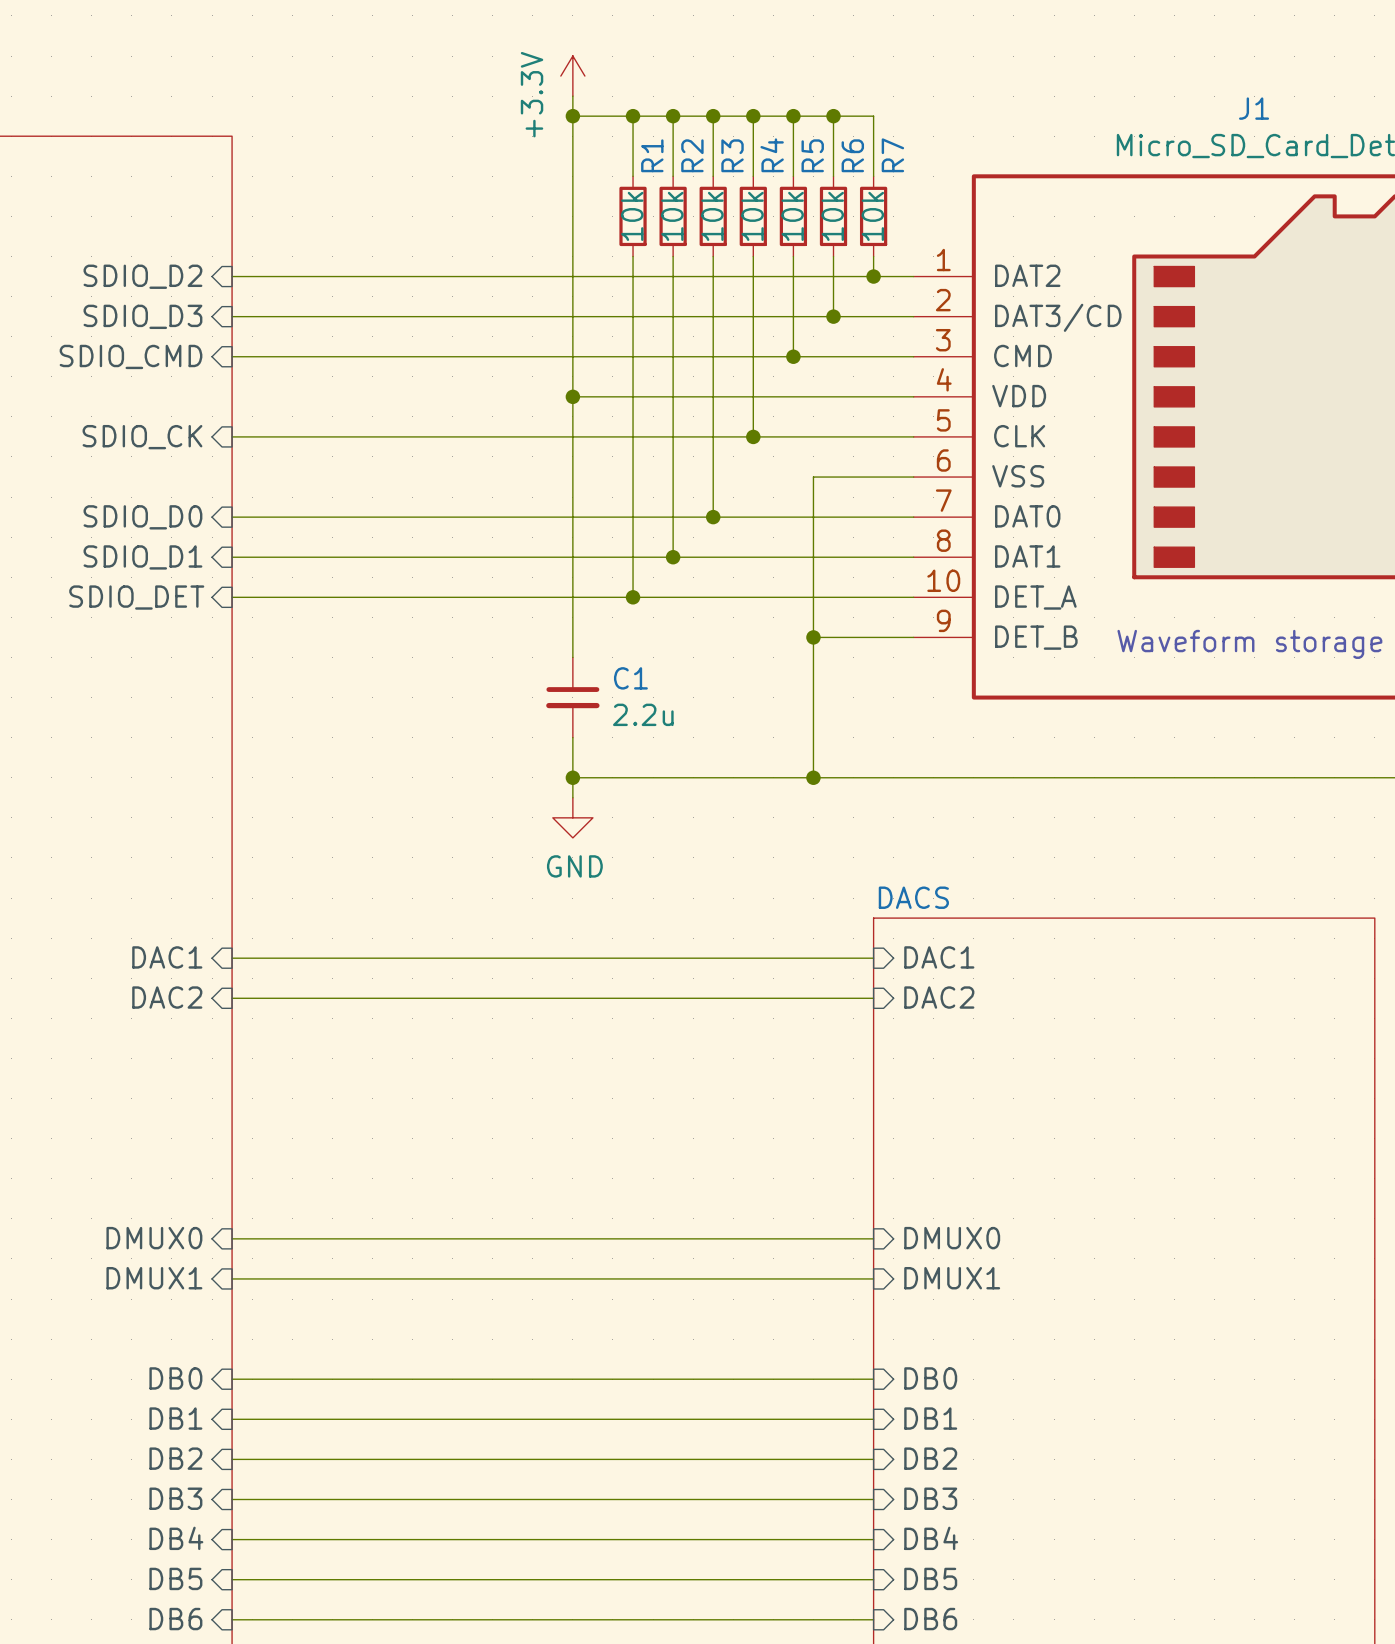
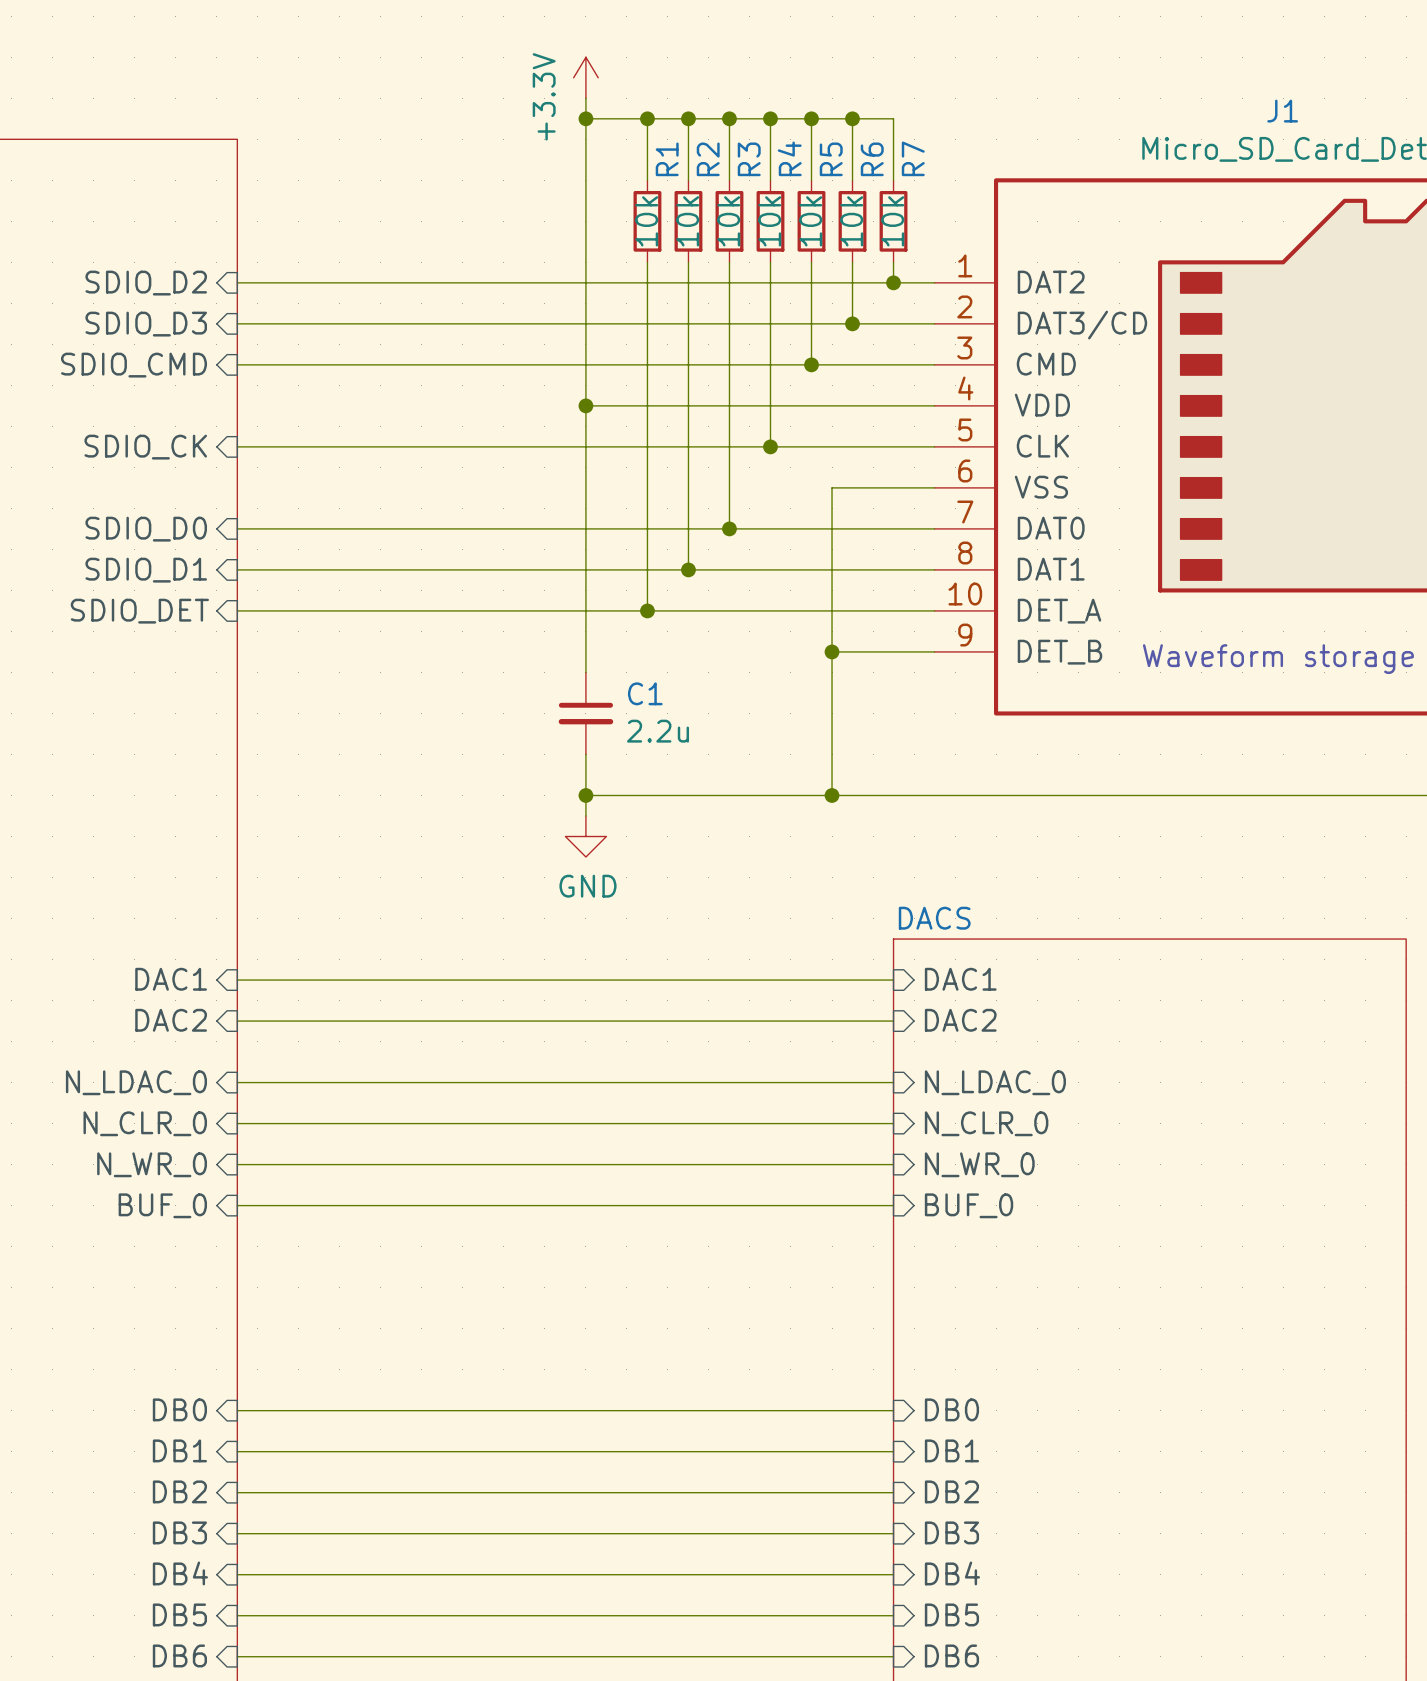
sheet pin: none -> N_LDAC_0 (136, 1082)
wire: none -> (237, 1082) (893, 1082)
sheet pin: none -> N_LDAC_0 (995, 1082)
sheet pin: none -> N_CLR_0 (145, 1123)
wire: none -> (237, 1123) (893, 1123)
sheet pin: none -> N_CLR_0 (986, 1123)
sheet pin: none -> N_WR_0 (152, 1164)
sheet pin: none -> N_WR_0 (979, 1164)
sheet pin: none -> BUF_0 (162, 1205)
sheet pin: none -> BUF_0 (969, 1205)
sheet pin: DMUX0 (154, 1238) -> none
wire: (232, 1238) (873, 1238) -> (237, 1164) (893, 1164)
sheet pin: DMUX0 (952, 1238) -> none
sheet pin: DMUX1 (154, 1278) -> none
wire: (232, 1278) (873, 1278) -> (237, 1205) (893, 1205)
sheet pin: DMUX1 (952, 1278) -> none

